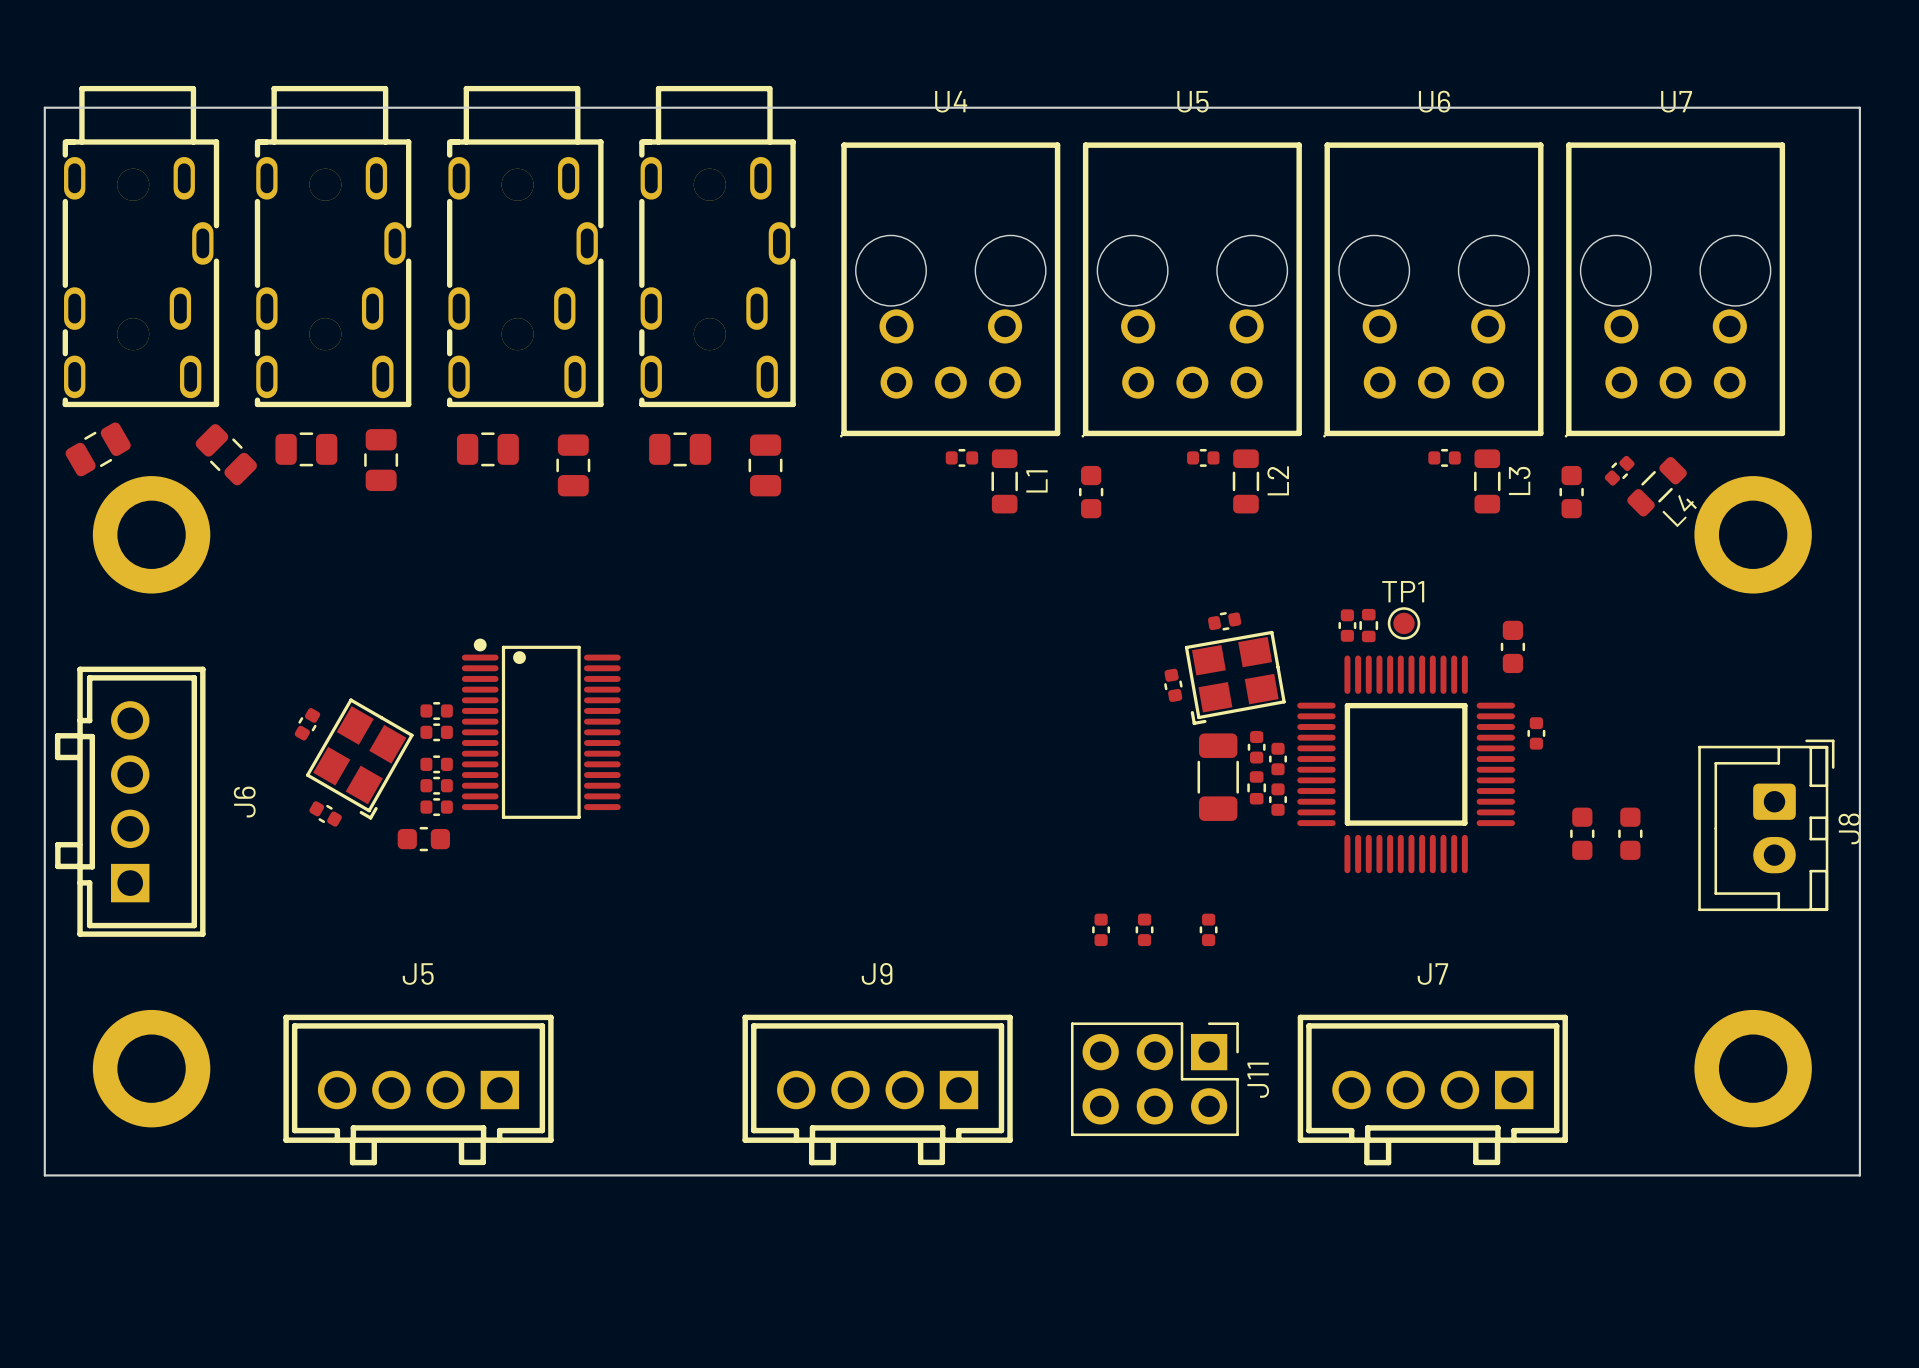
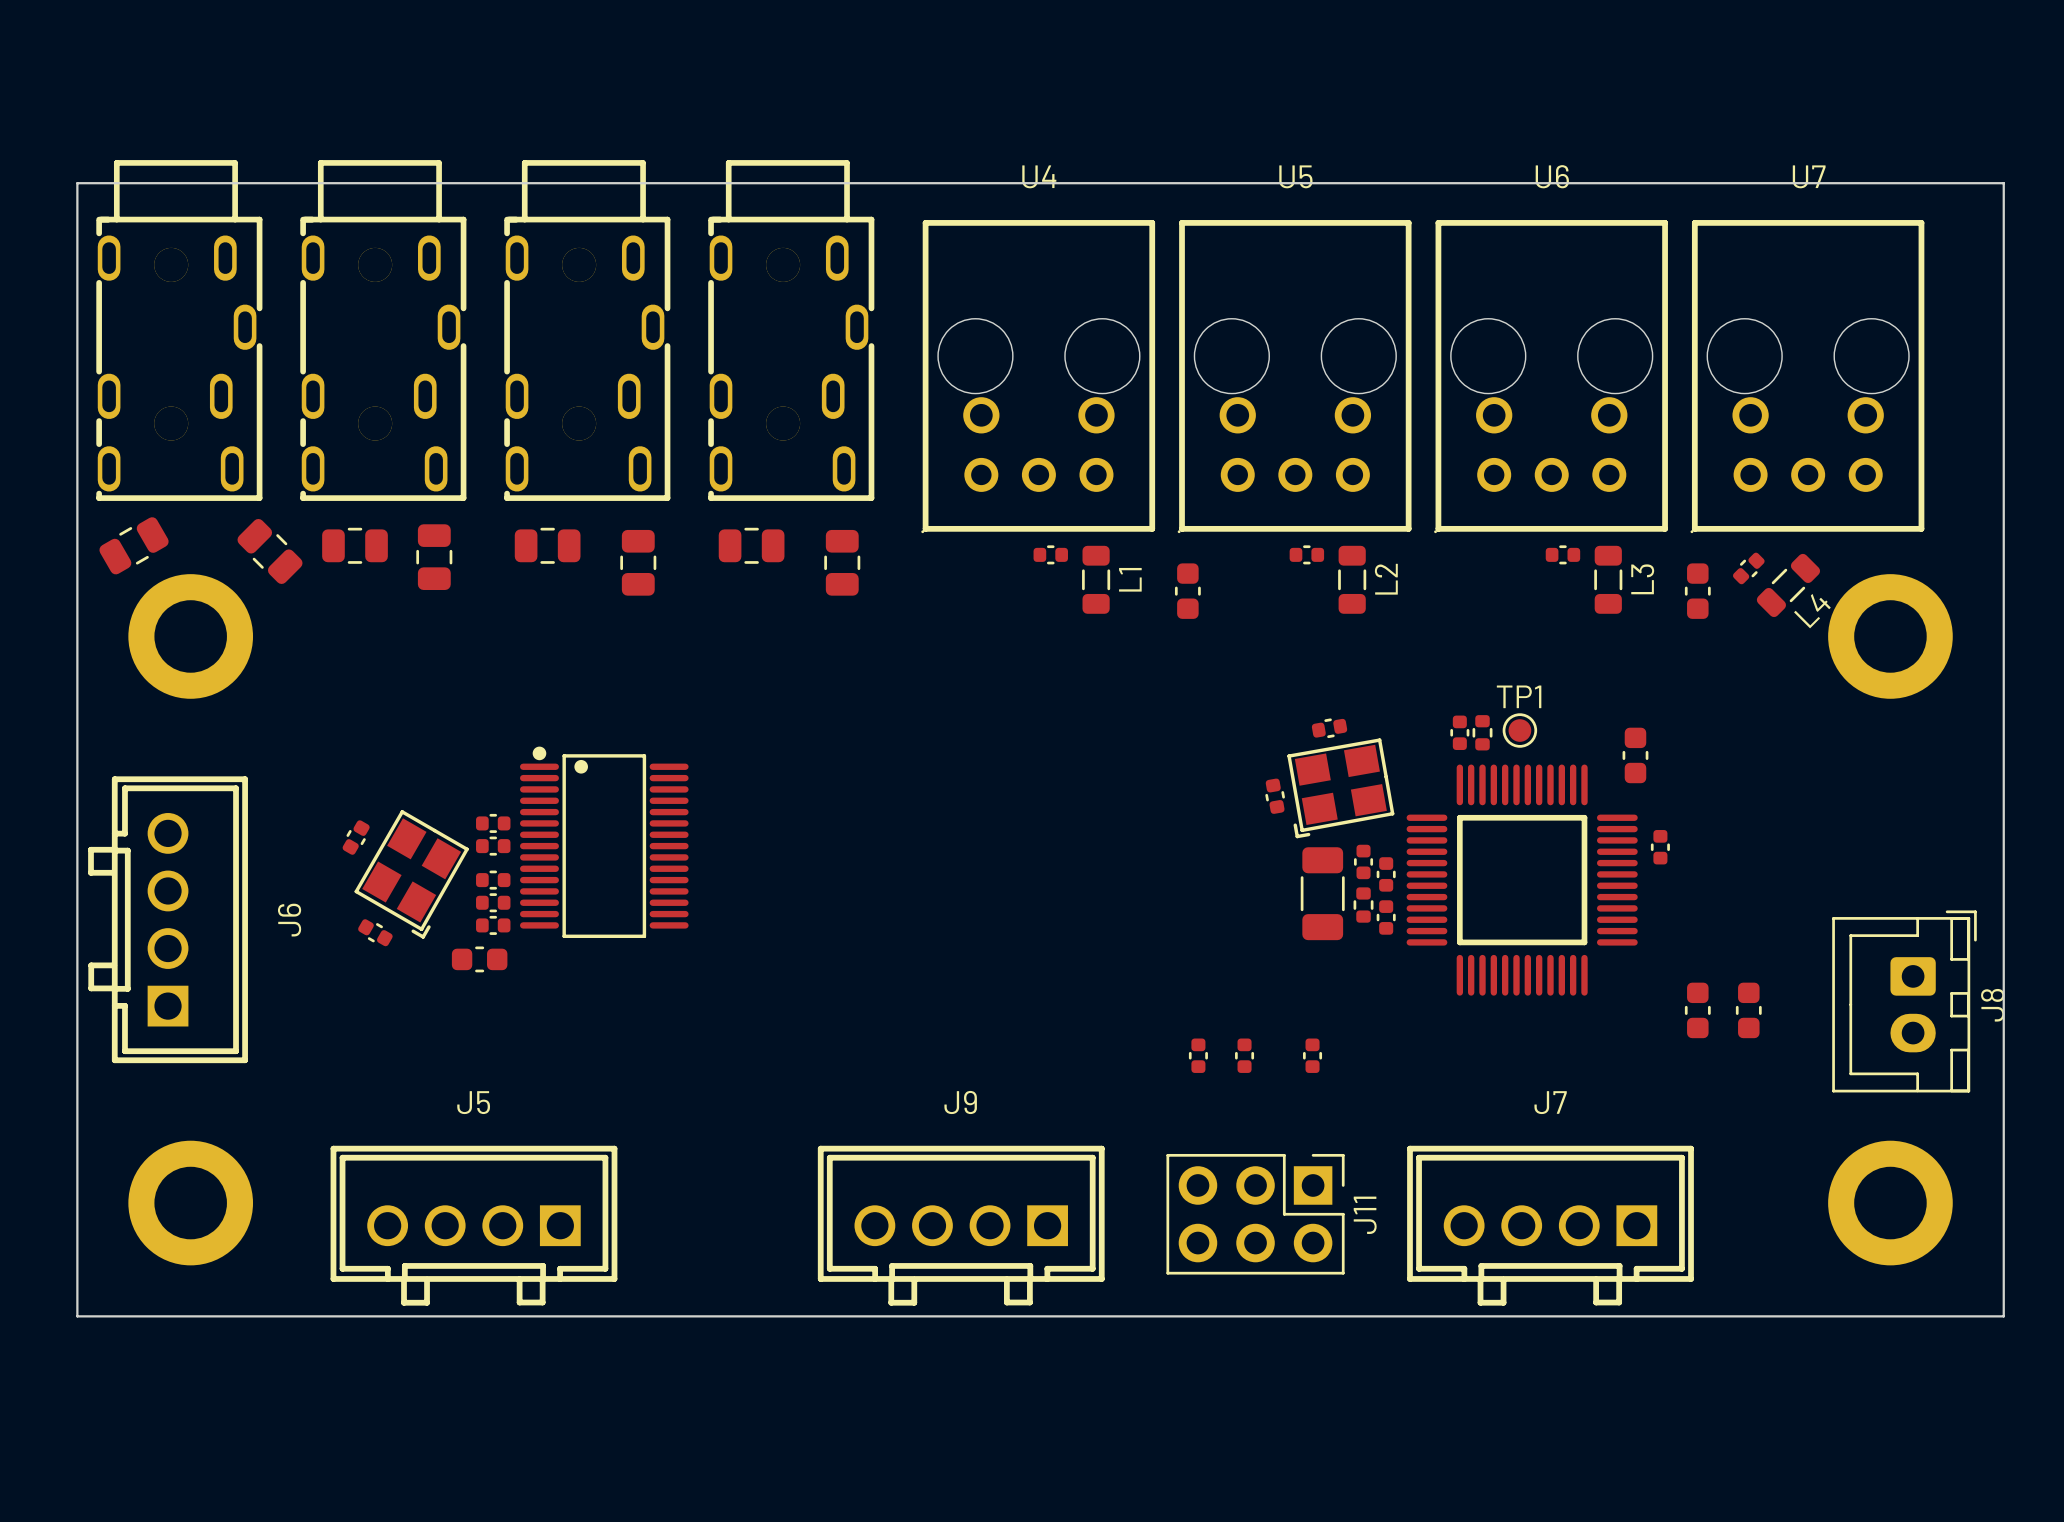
J8 position: (1766, 825) -> (1904, 1001)
part: (1582, 833) -> none
part: (1630, 833) -> none
part: none -> (1697, 1010)
part: none -> (1748, 1010)

